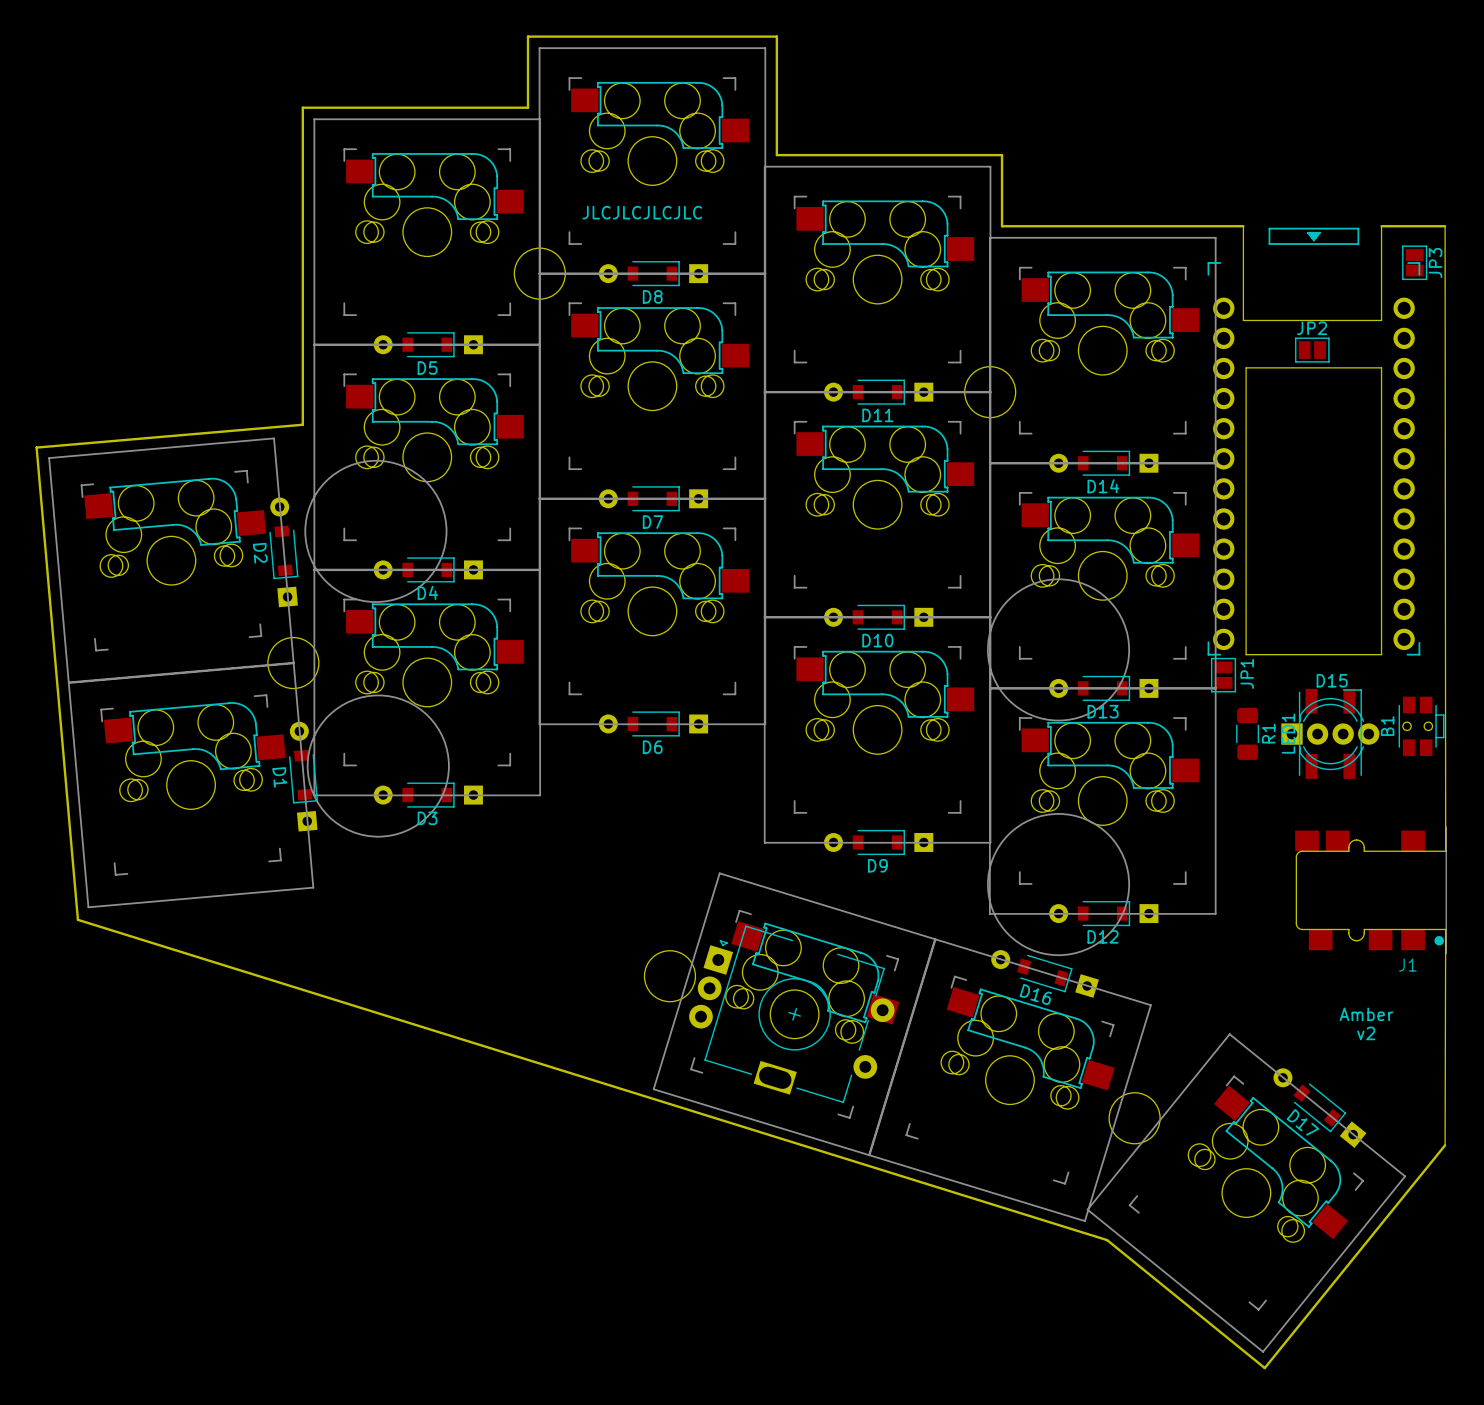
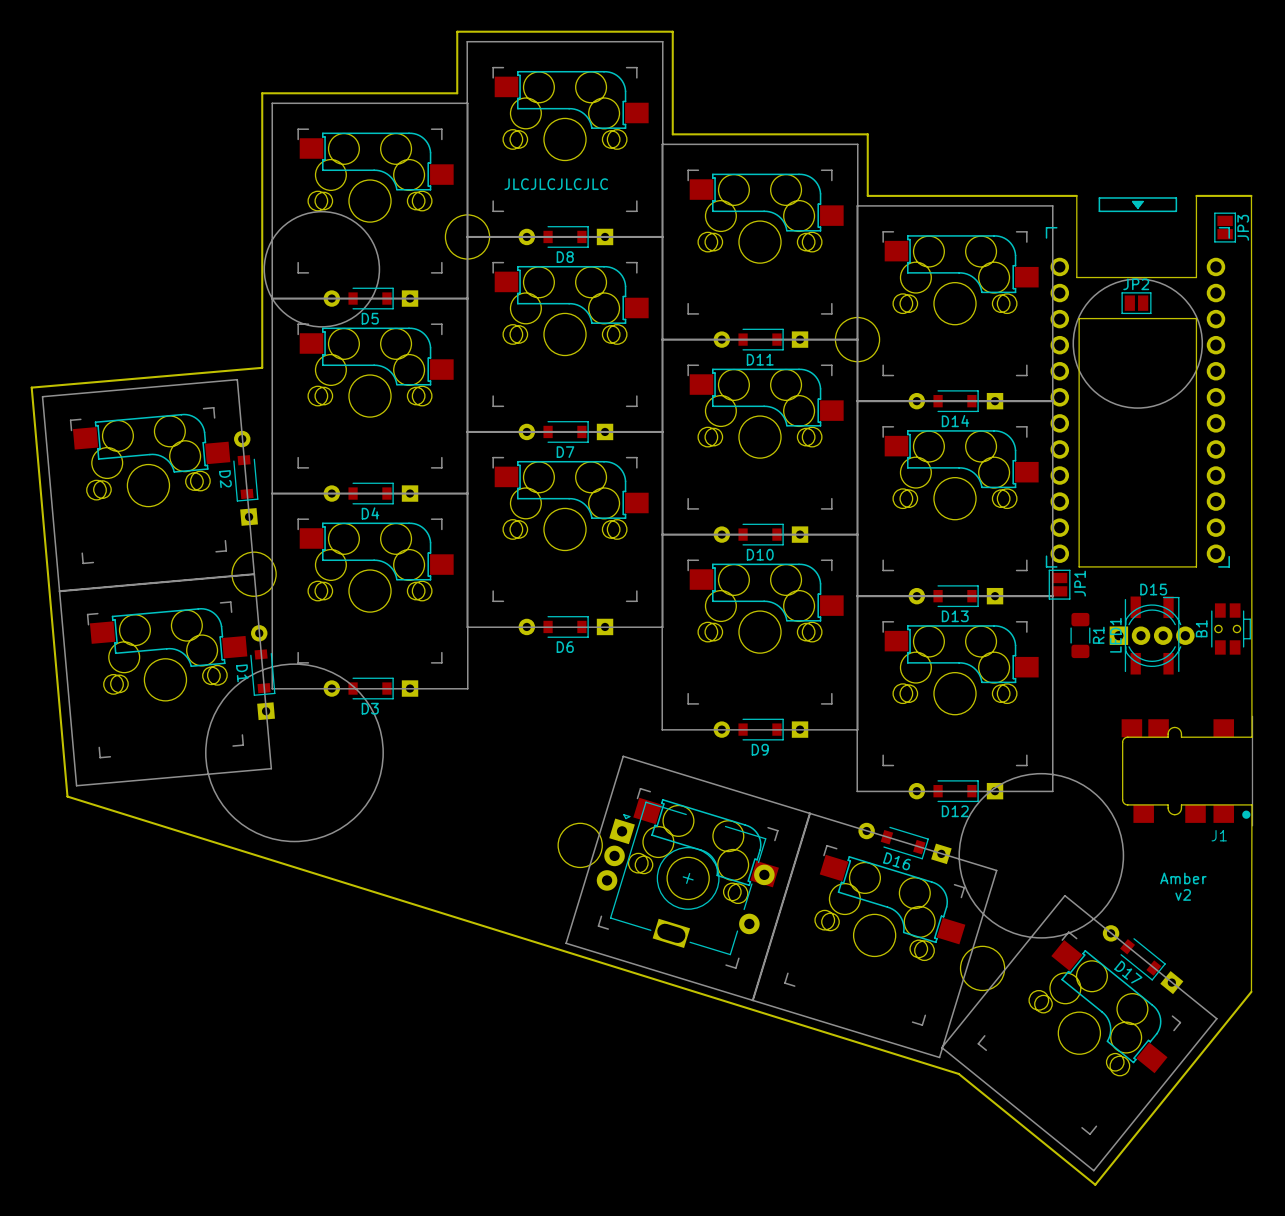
drawing: none -> [263, 210, 381, 328]
drawing: none -> [1072, 278, 1204, 409]
drawing: [304, 459, 448, 603] -> none
drawing: [987, 578, 1131, 722] -> none
drawing: [306, 694, 450, 838] -> none
drawing: none -> [205, 663, 384, 843]
drawing: [987, 813, 1131, 957] -> none
drawing: none -> [958, 772, 1125, 939]

